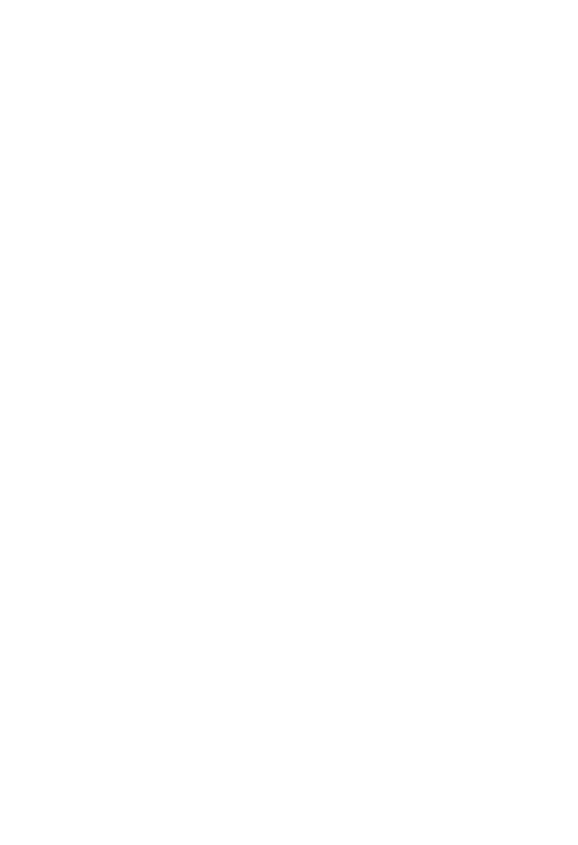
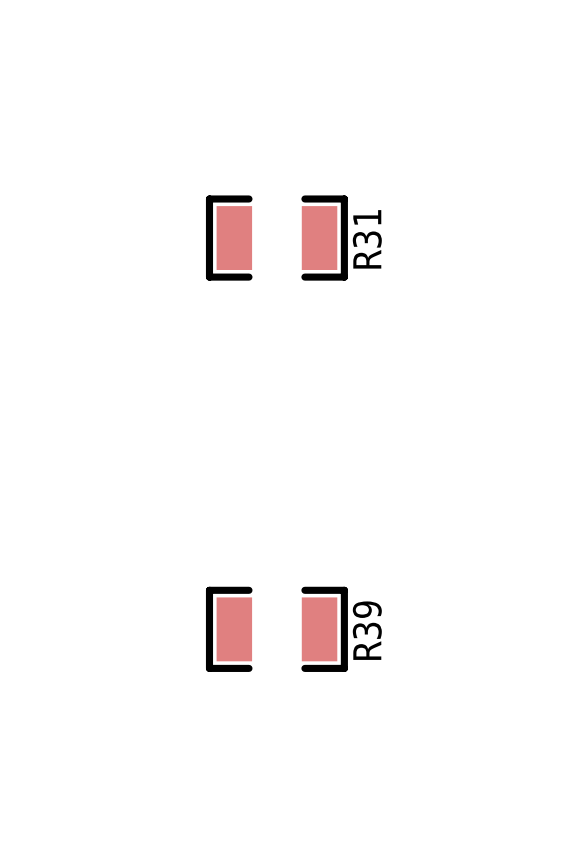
R31: none -> (276, 238)
R39: none -> (276, 629)

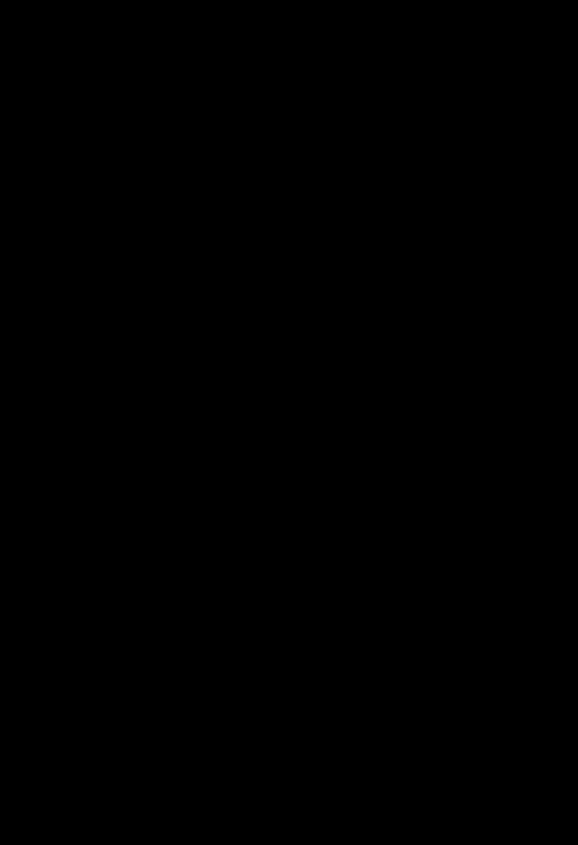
R31: (276, 238) -> none
R39: (276, 629) -> none

